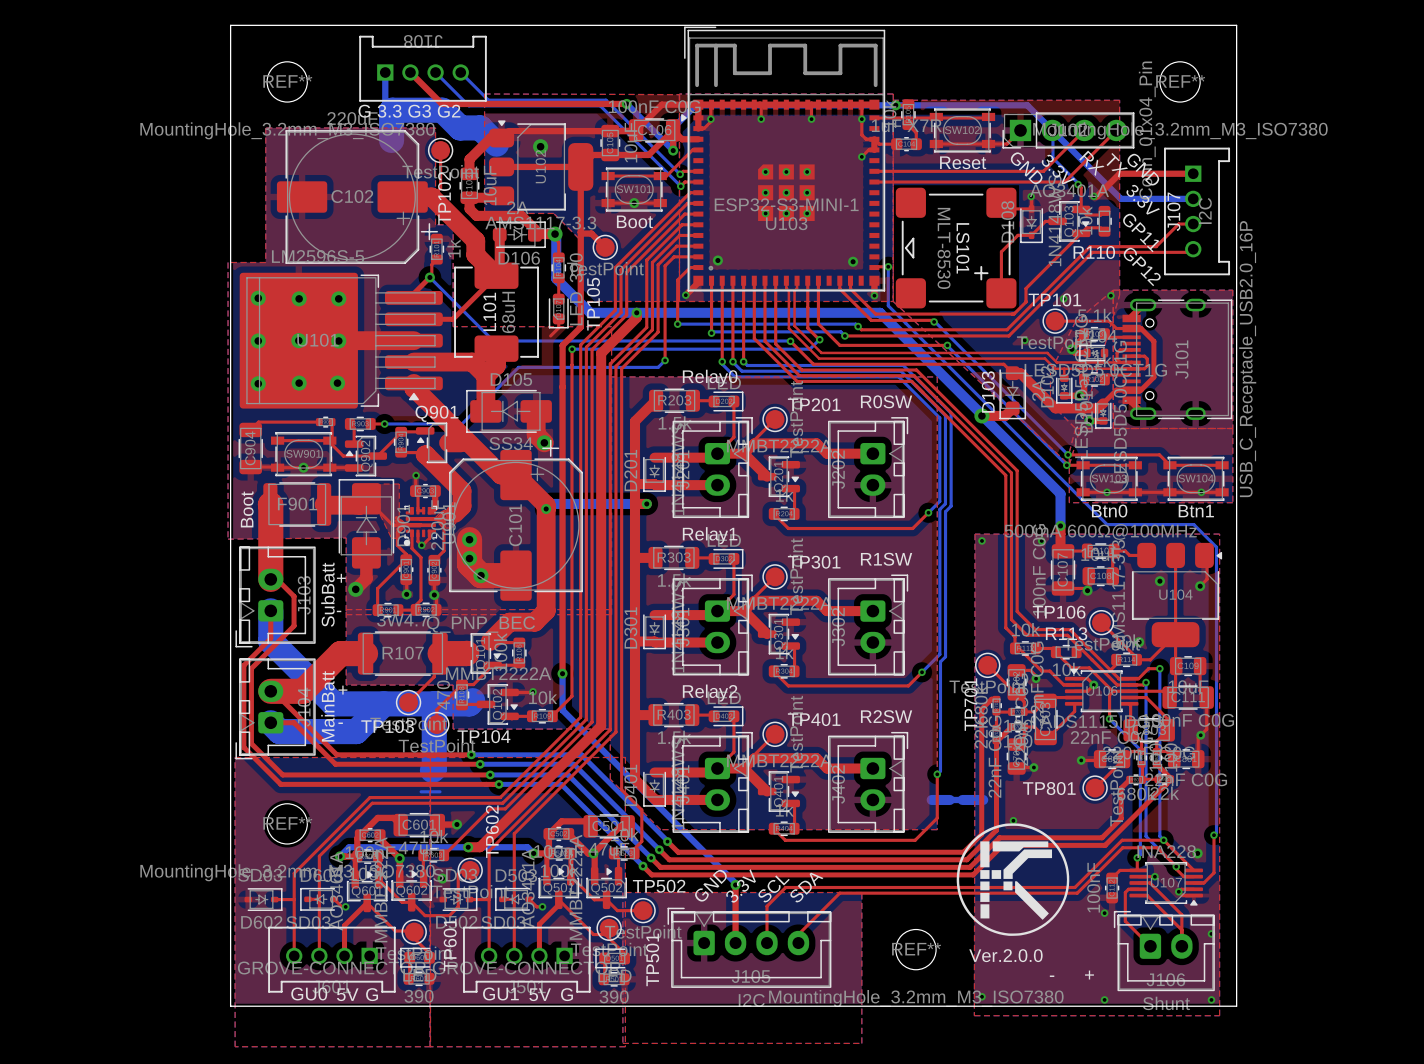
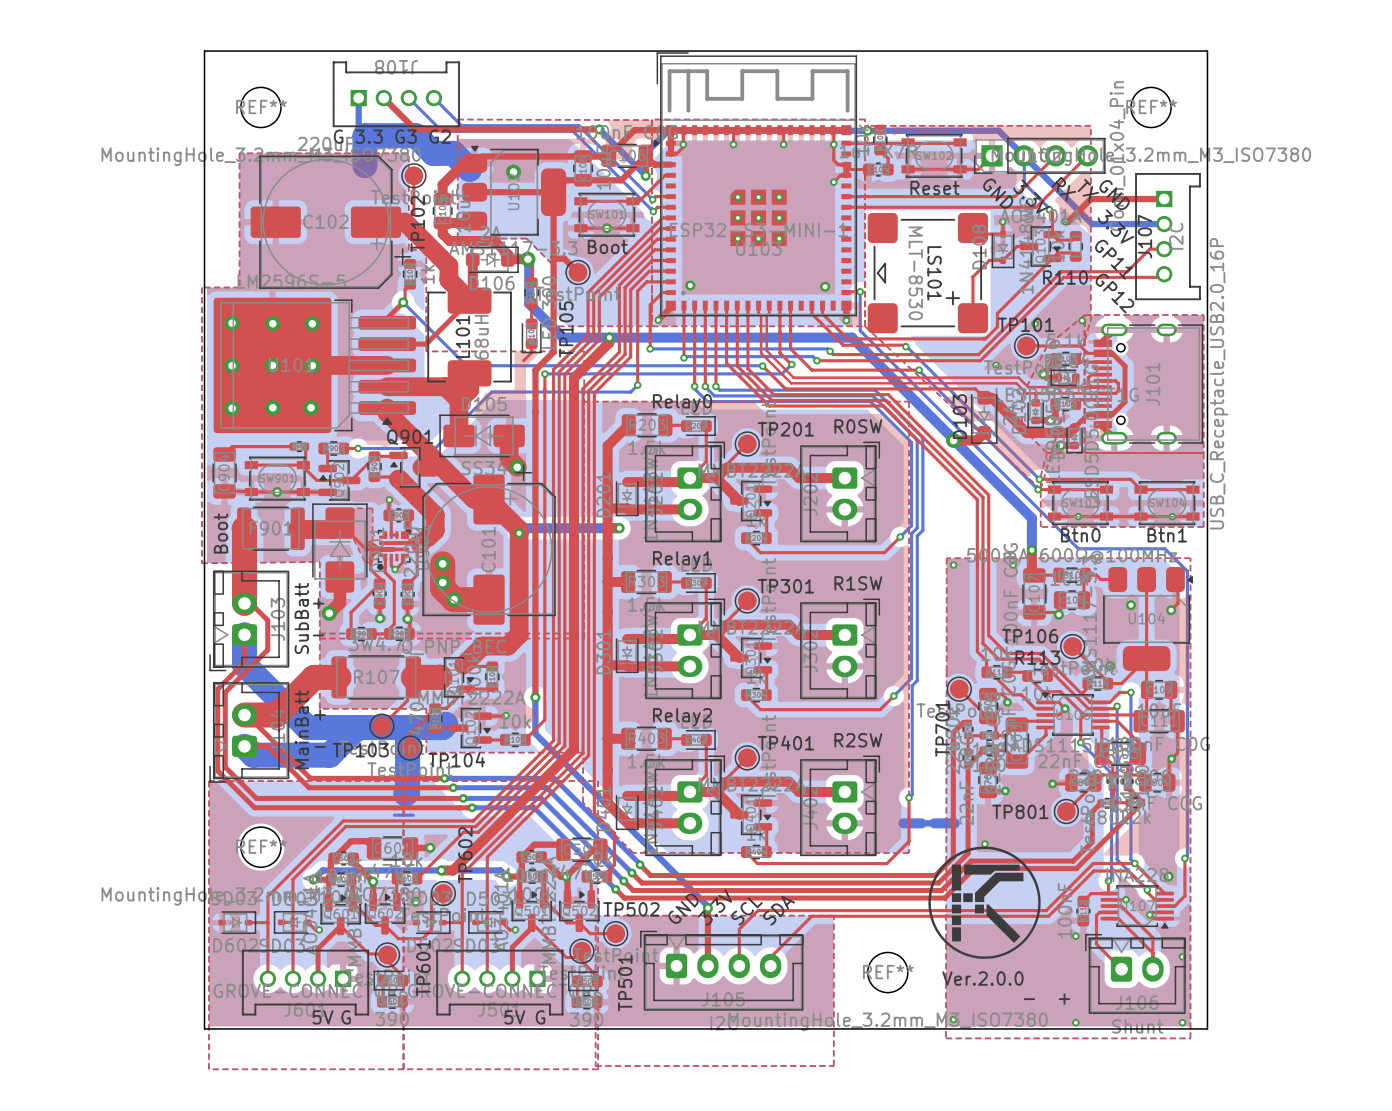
text: GU0 (309, 993) -> none
text: GU1 (500, 993) -> none

